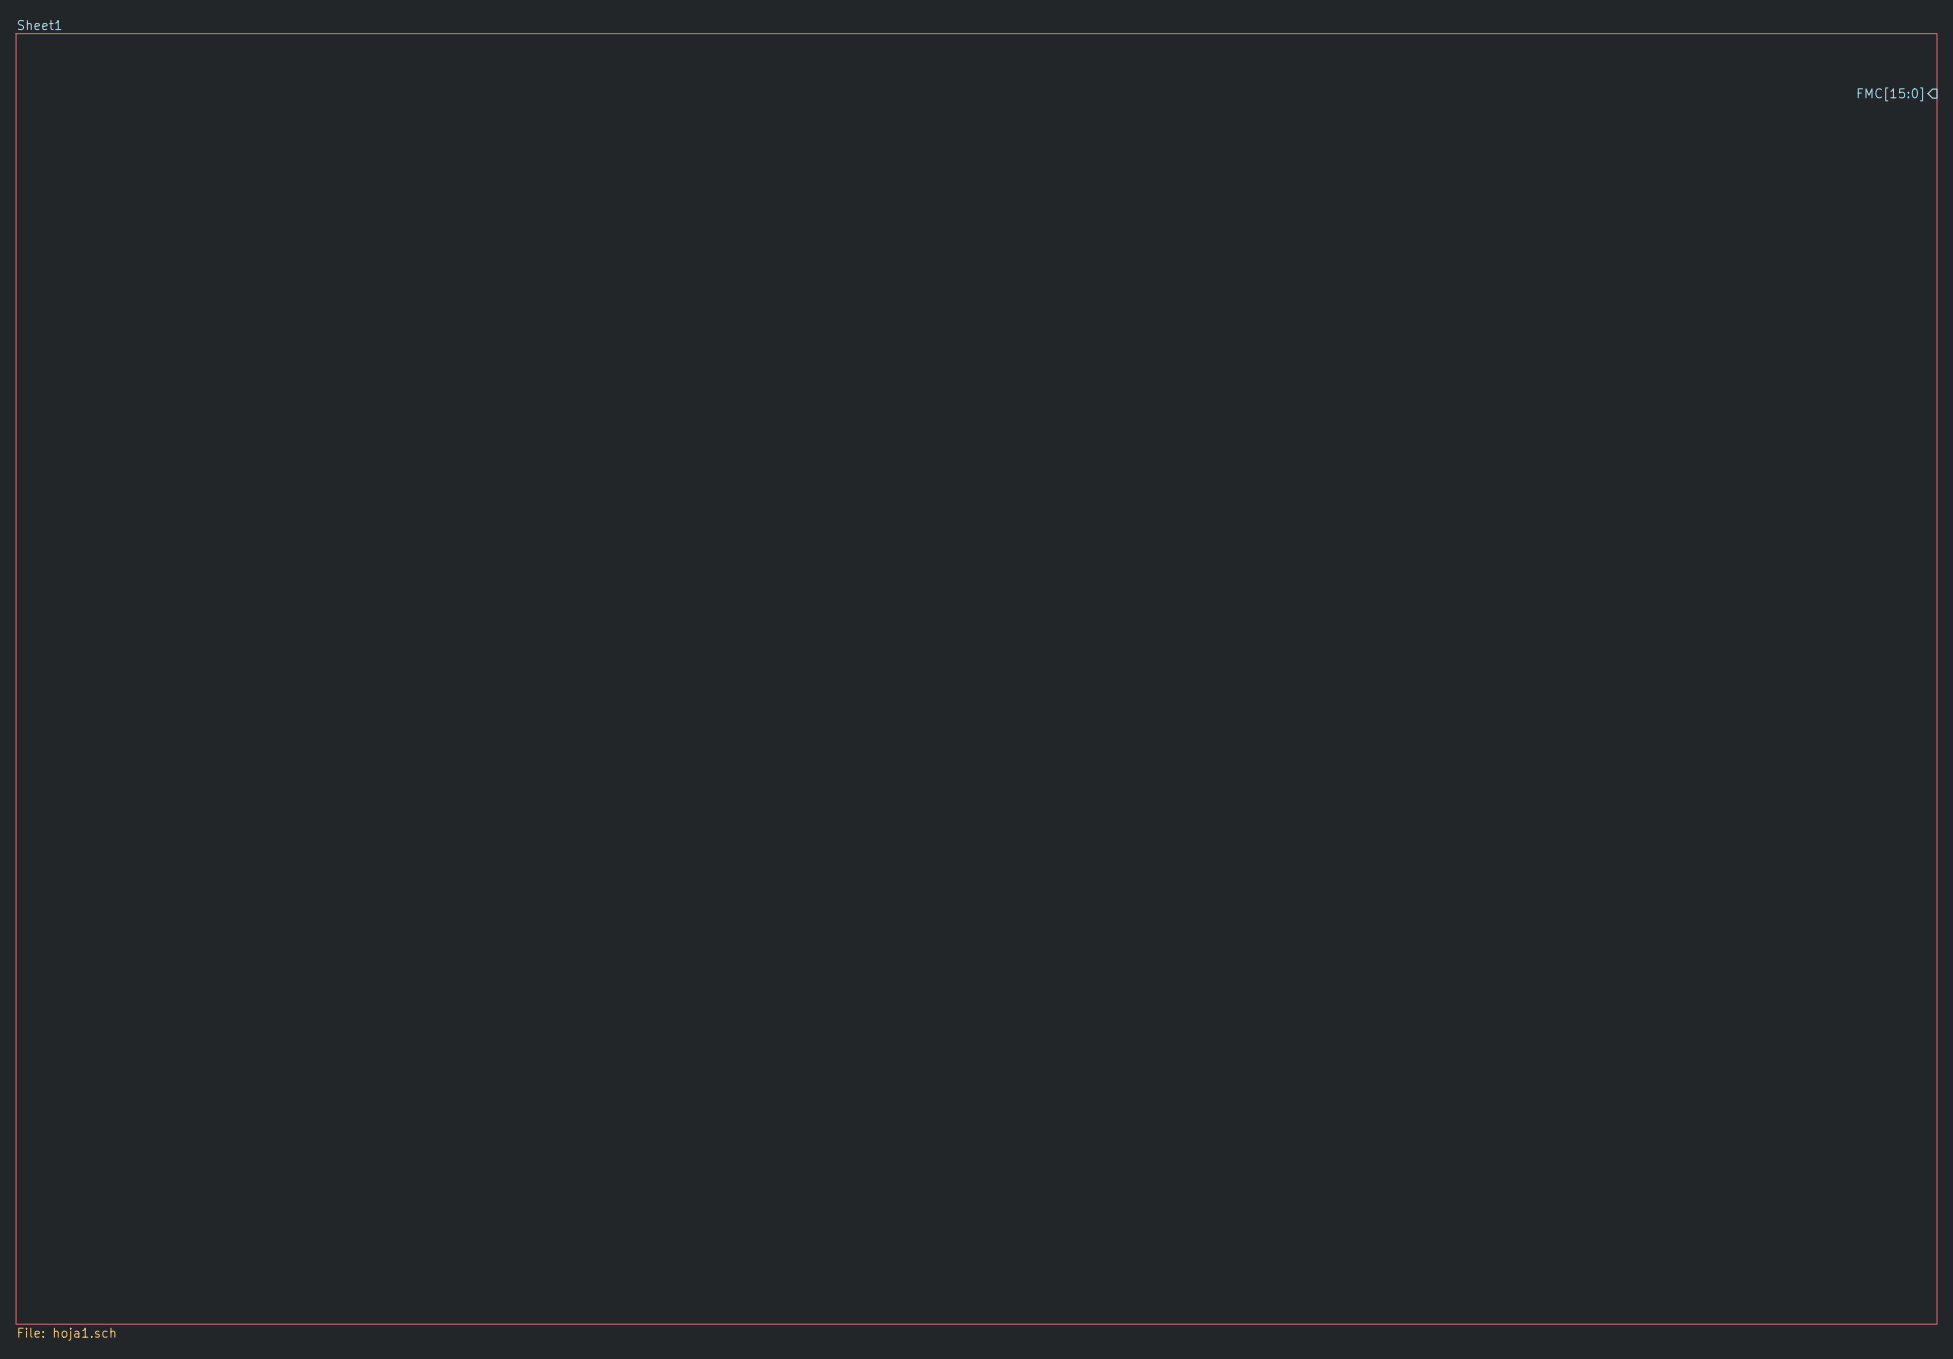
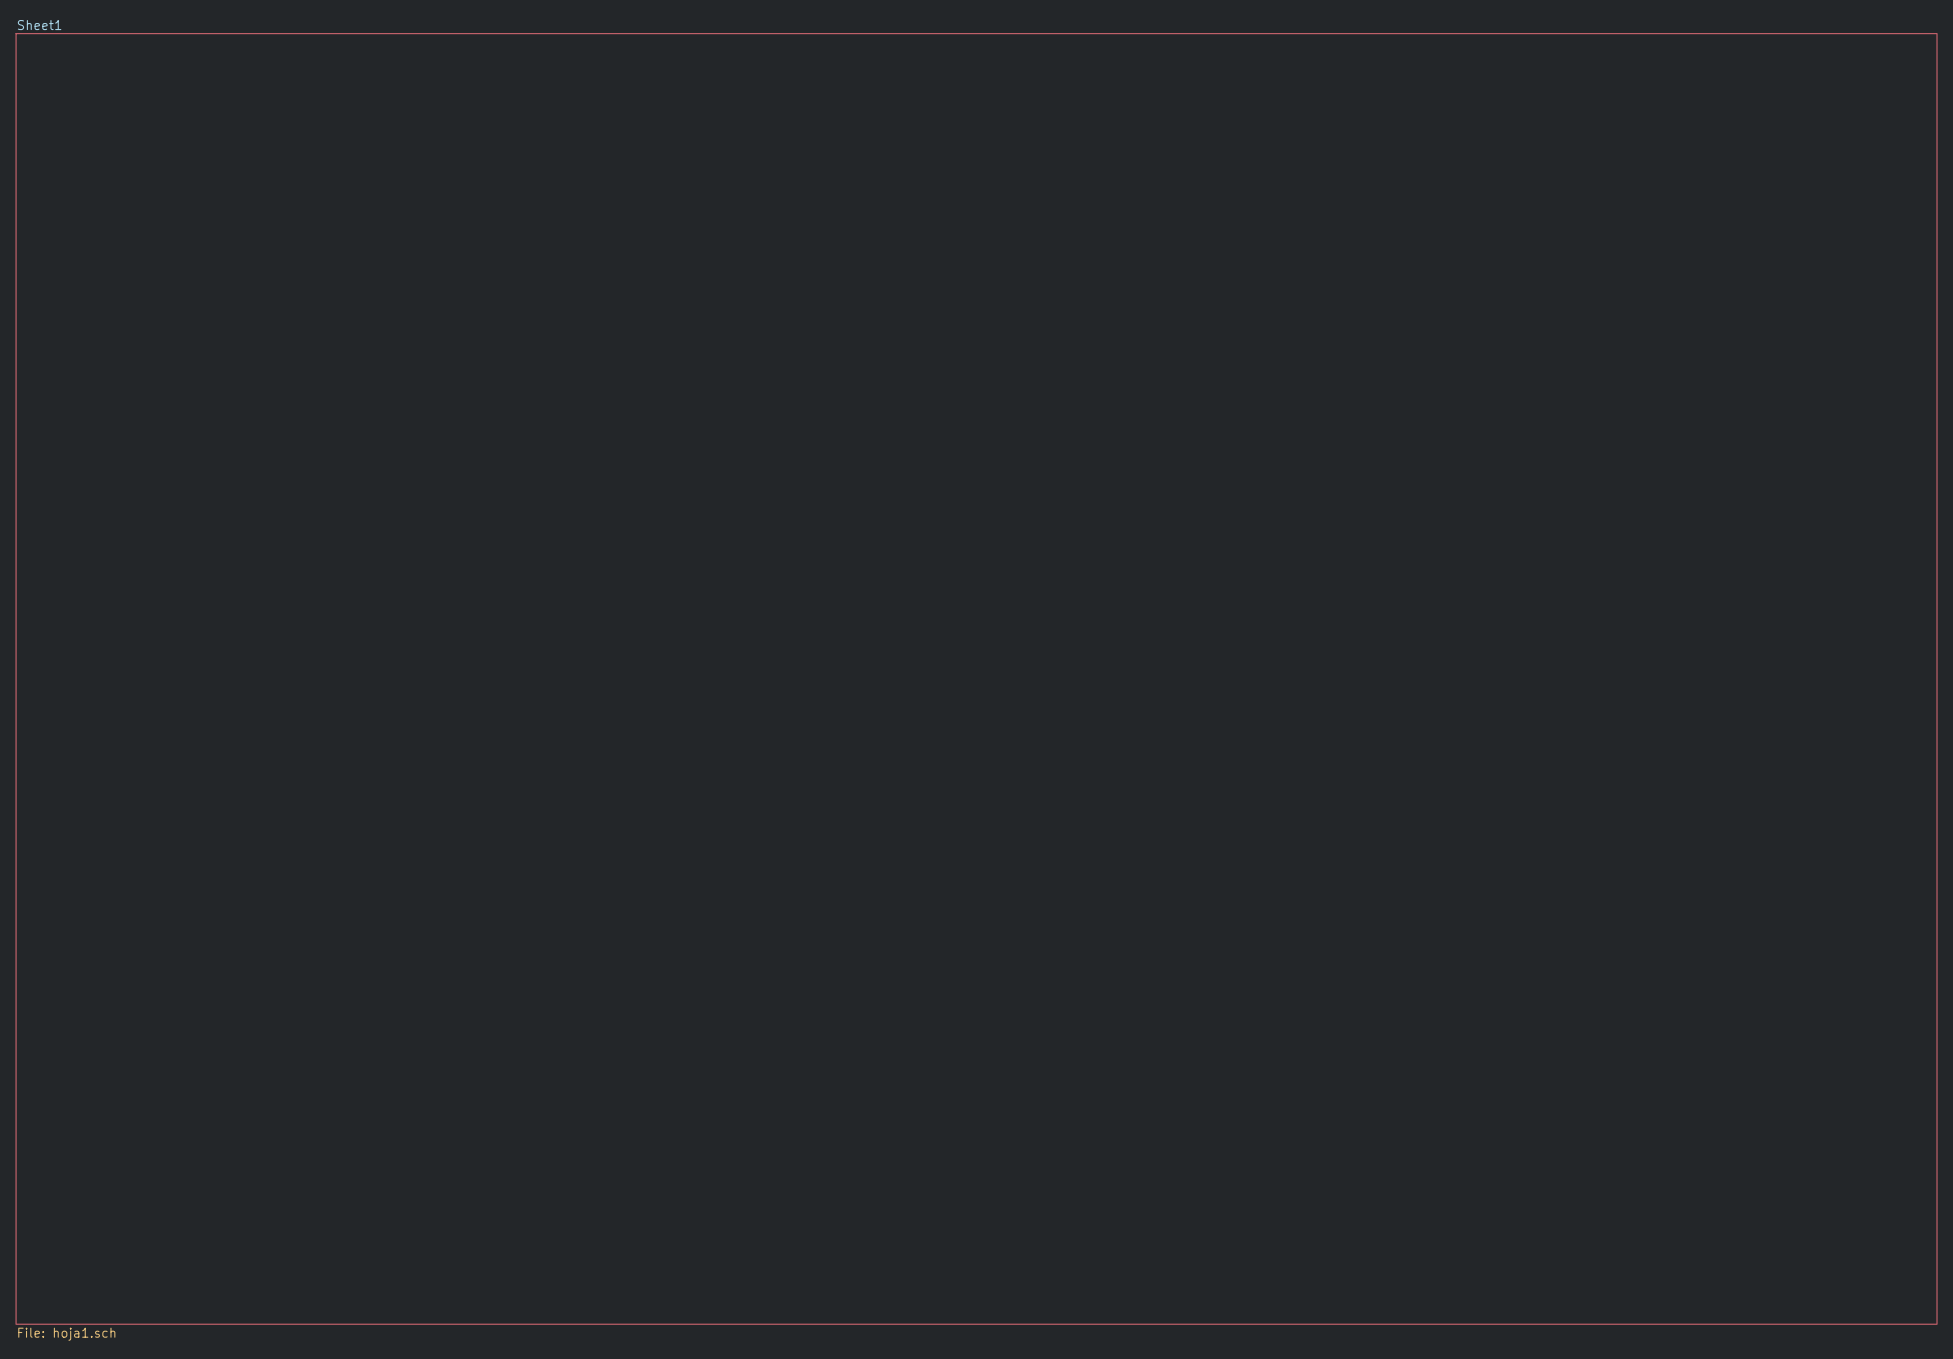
sheet pin: FMC[15:0] (1890, 94) -> none

